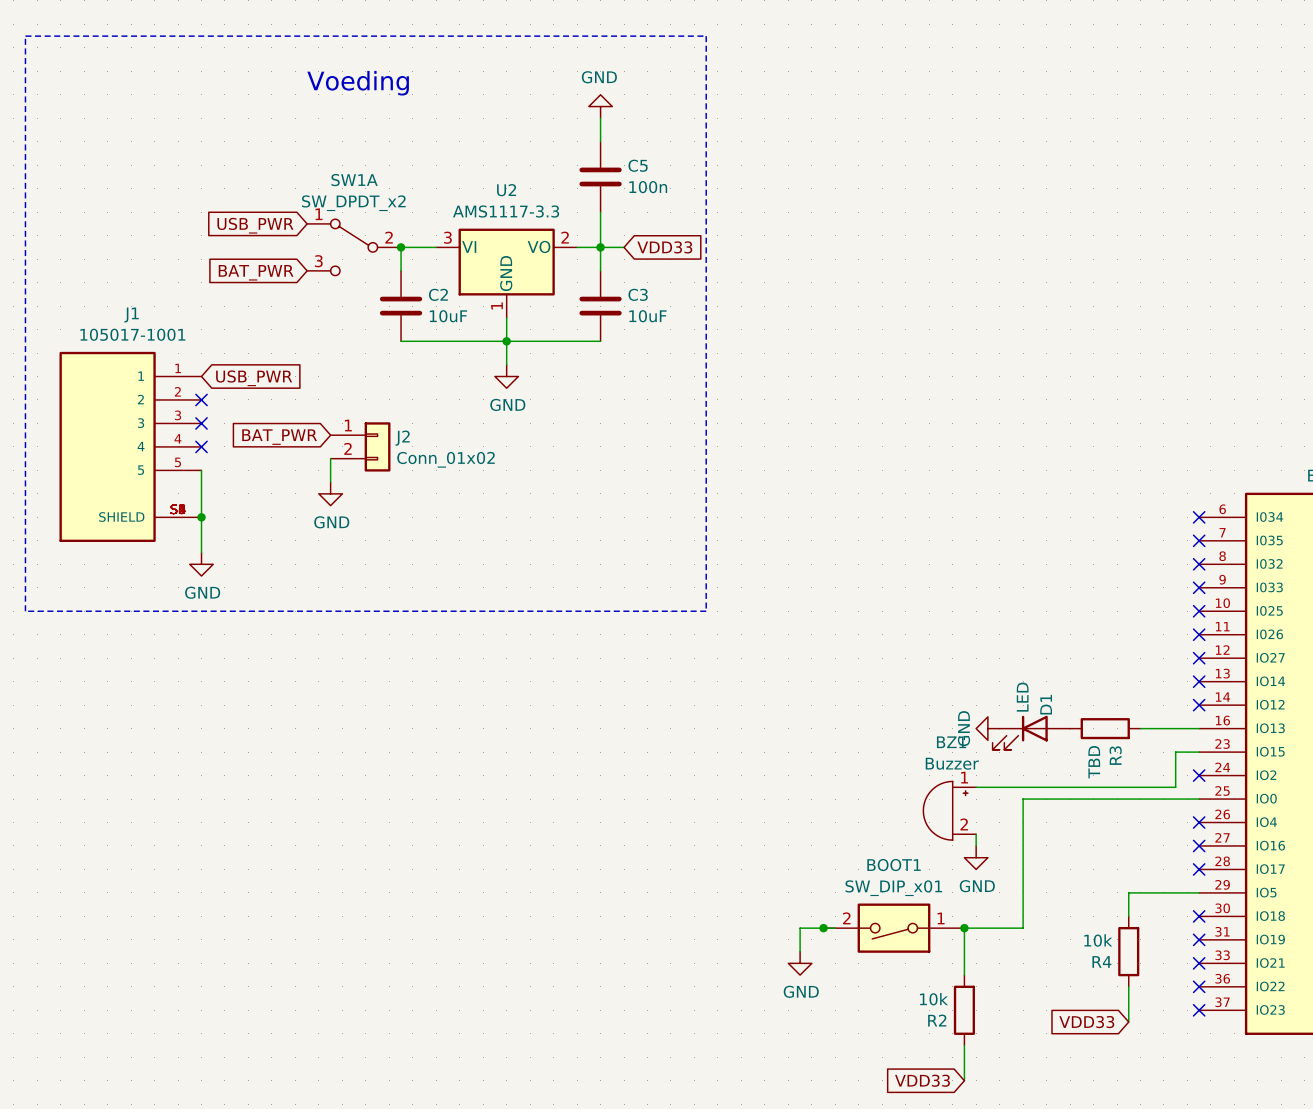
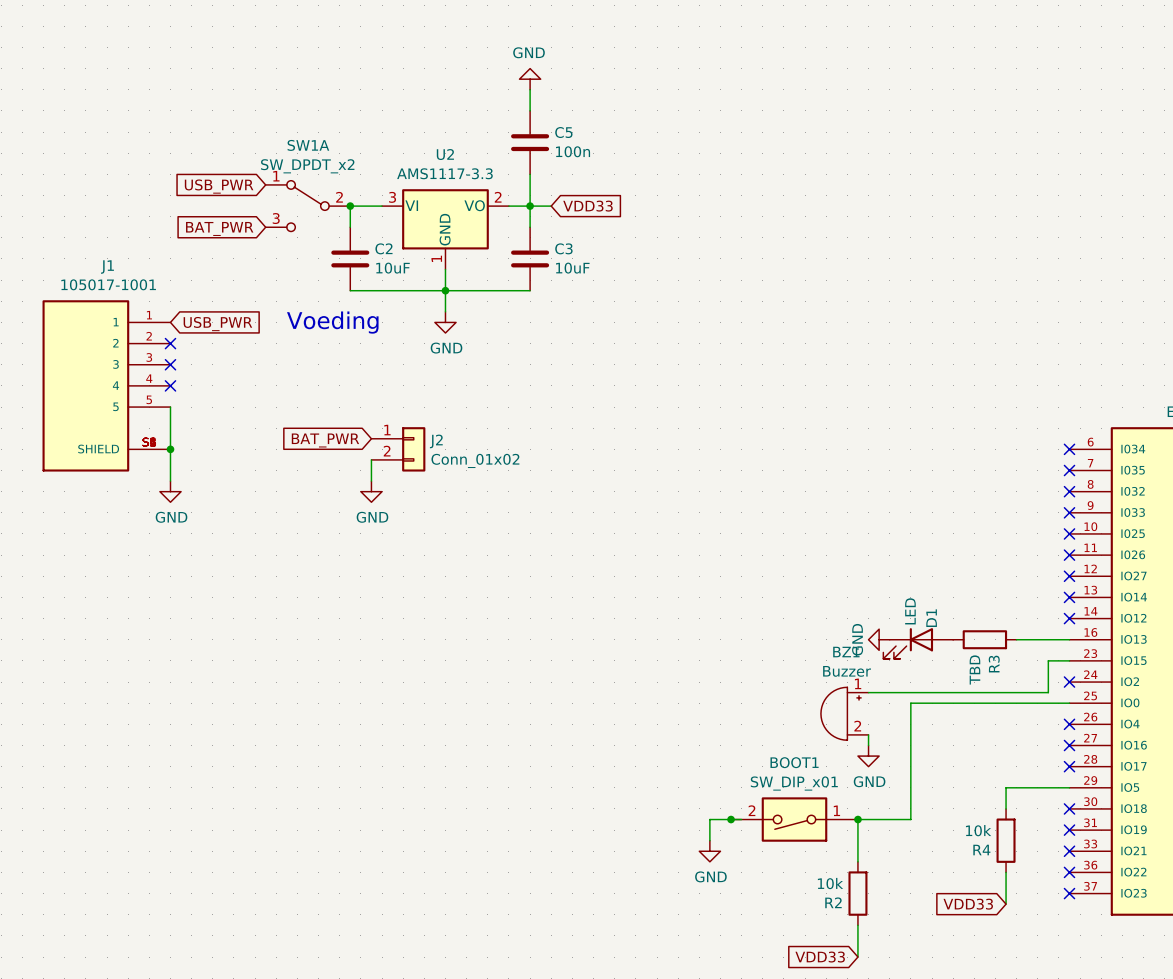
line: (25, 36) (706, 36) (706, 611) (25, 611) (25, 36) -> none
text: Voeding (358, 83) -> none
text: none -> Voeding (332, 322)
global label position: BAT_PWR (279, 437) -> BAT_PWR (325, 440)
J2 position: (360, 446) -> (398, 449)
wire: (330, 458) (330, 482) -> (371, 459) (371, 481)
power symbol position: GND (330, 493) -> GND (371, 491)

